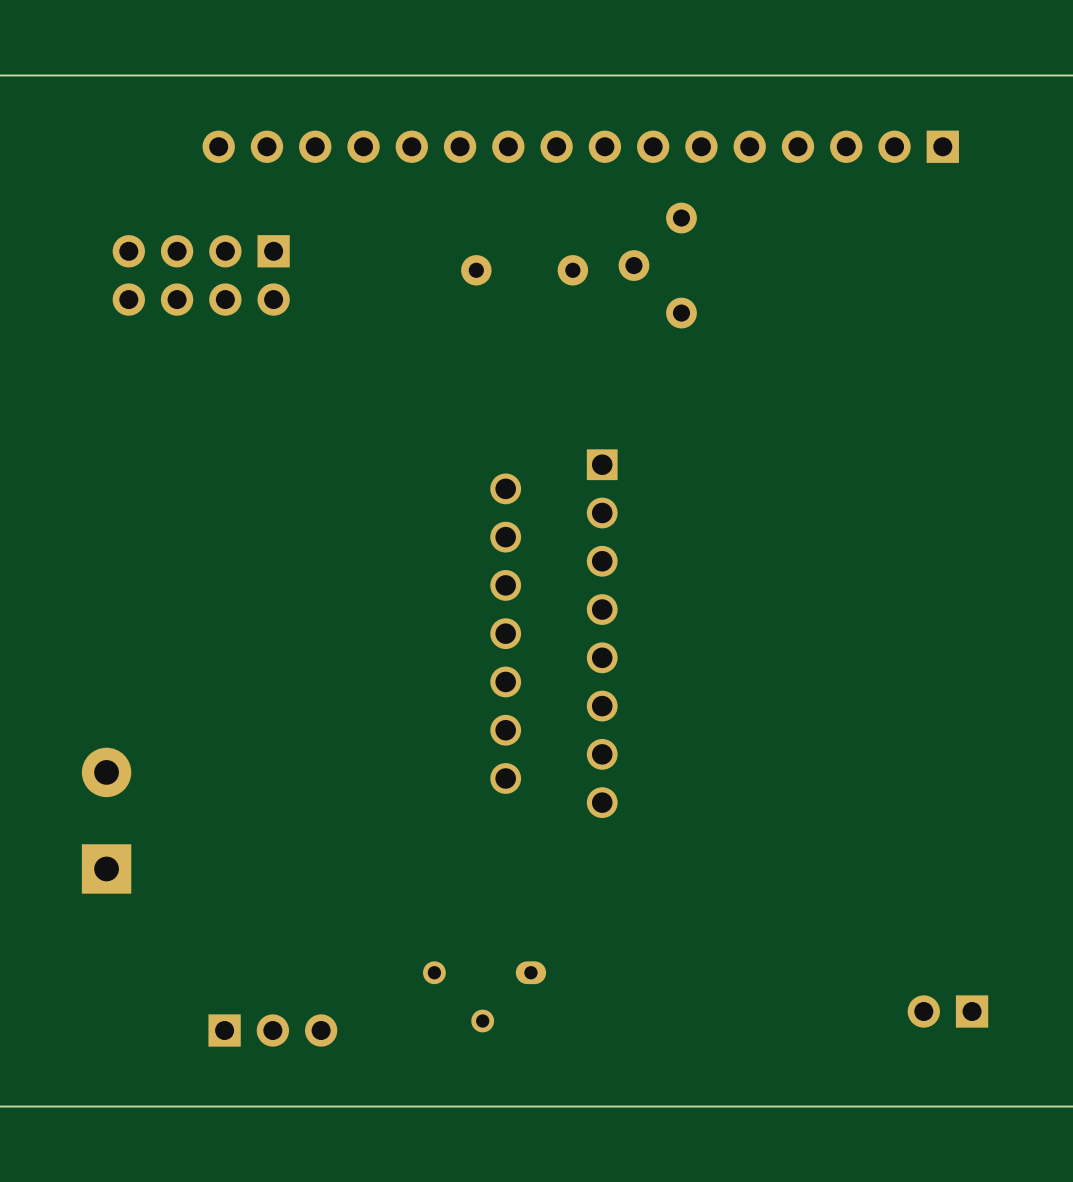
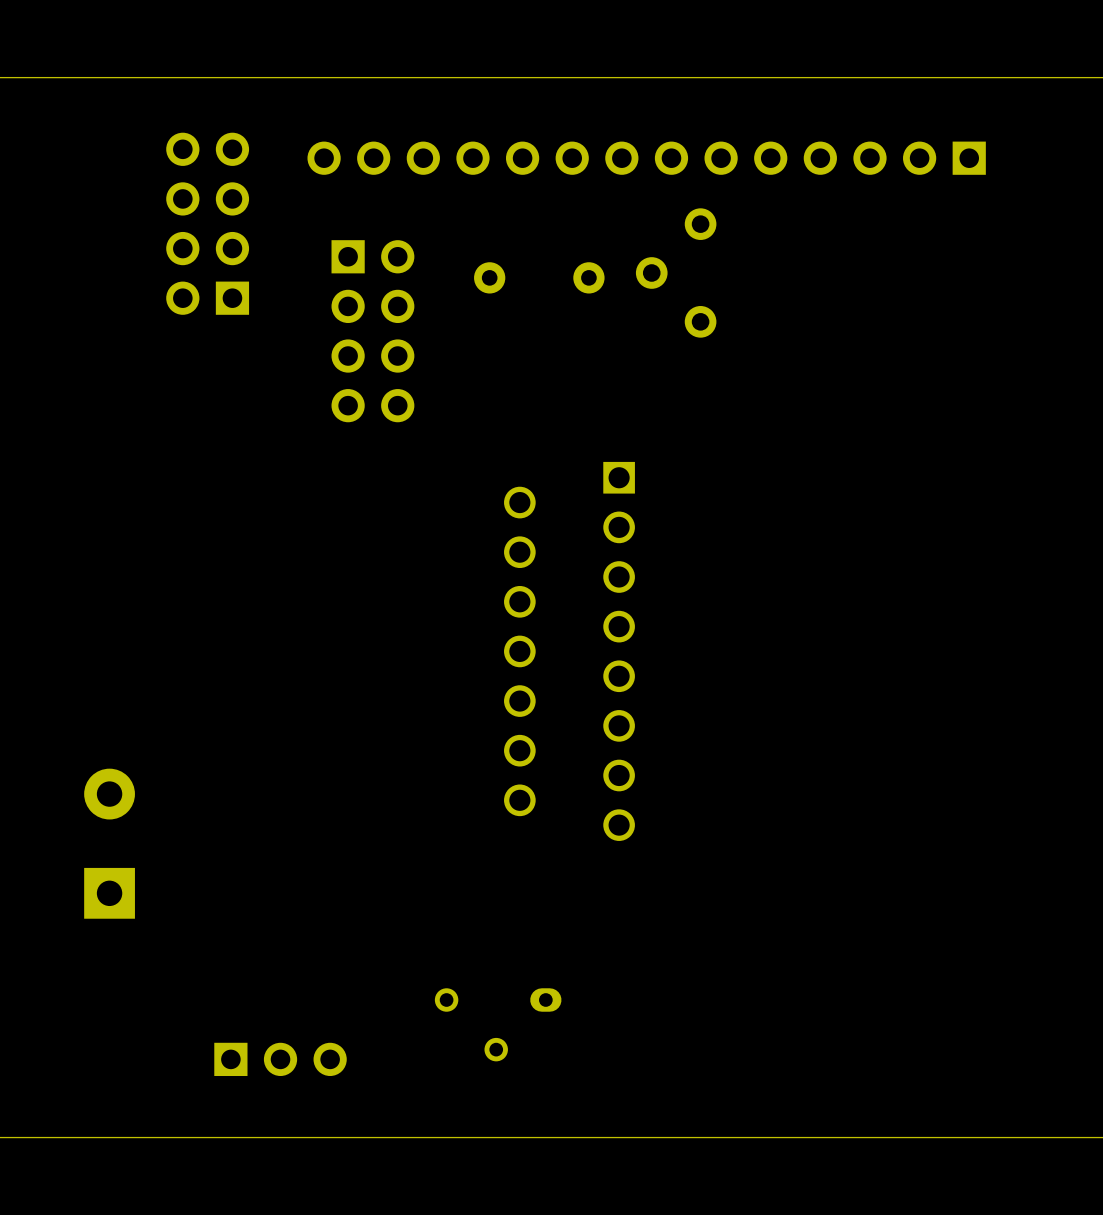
part: (580, 146) -> none
part: none -> (646, 158)
part rotation: 0° (201, 275) -> 90° clockwise (207, 223)
part: none -> (372, 331)
part: (947, 1011) -> none

